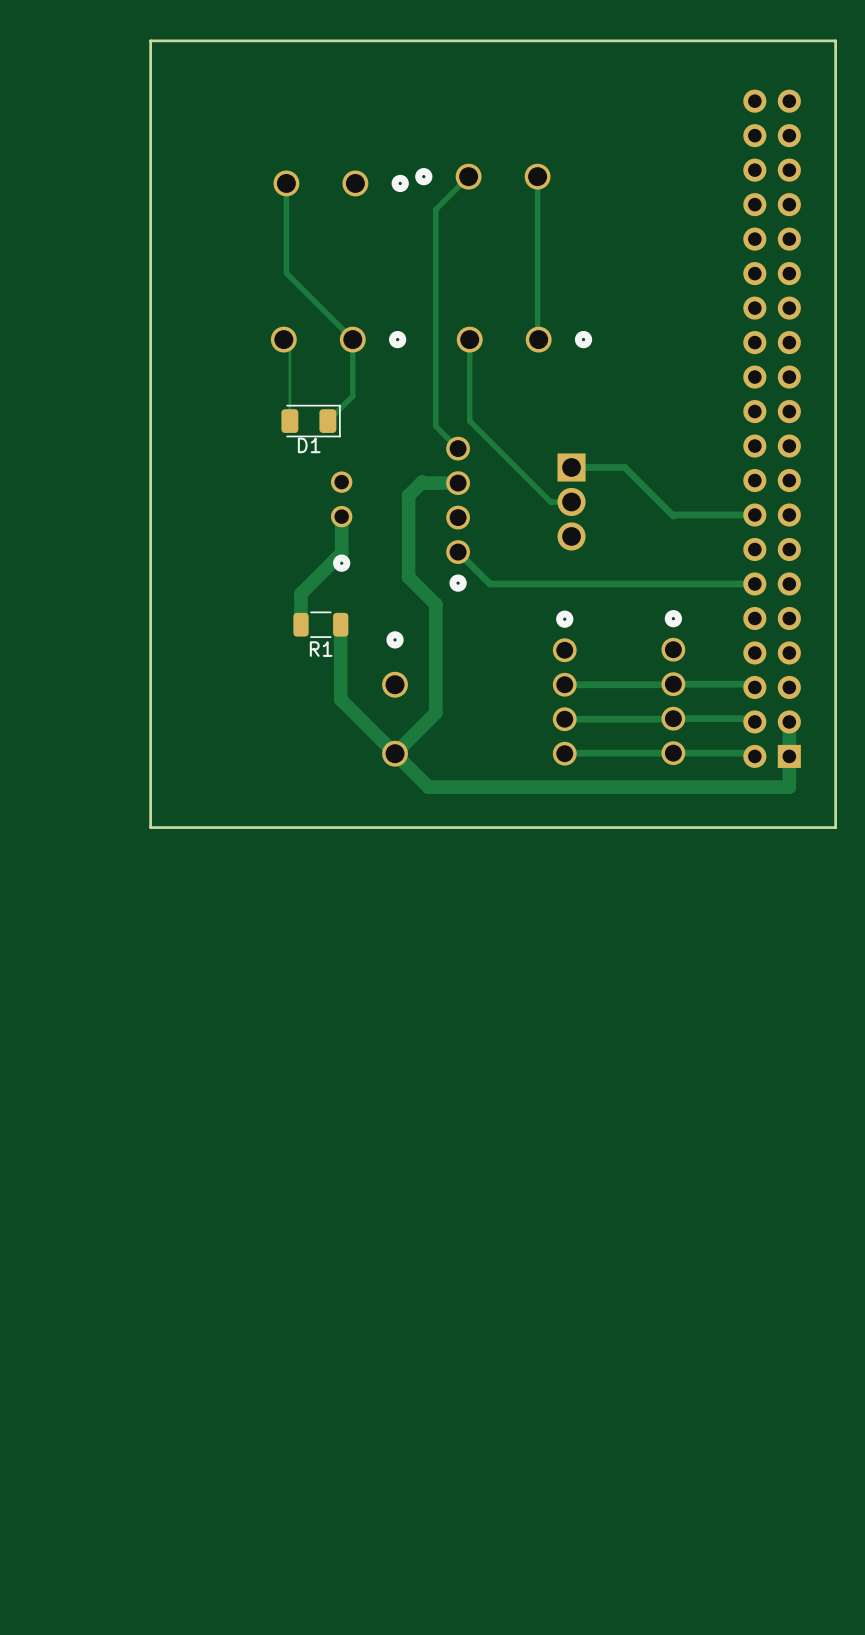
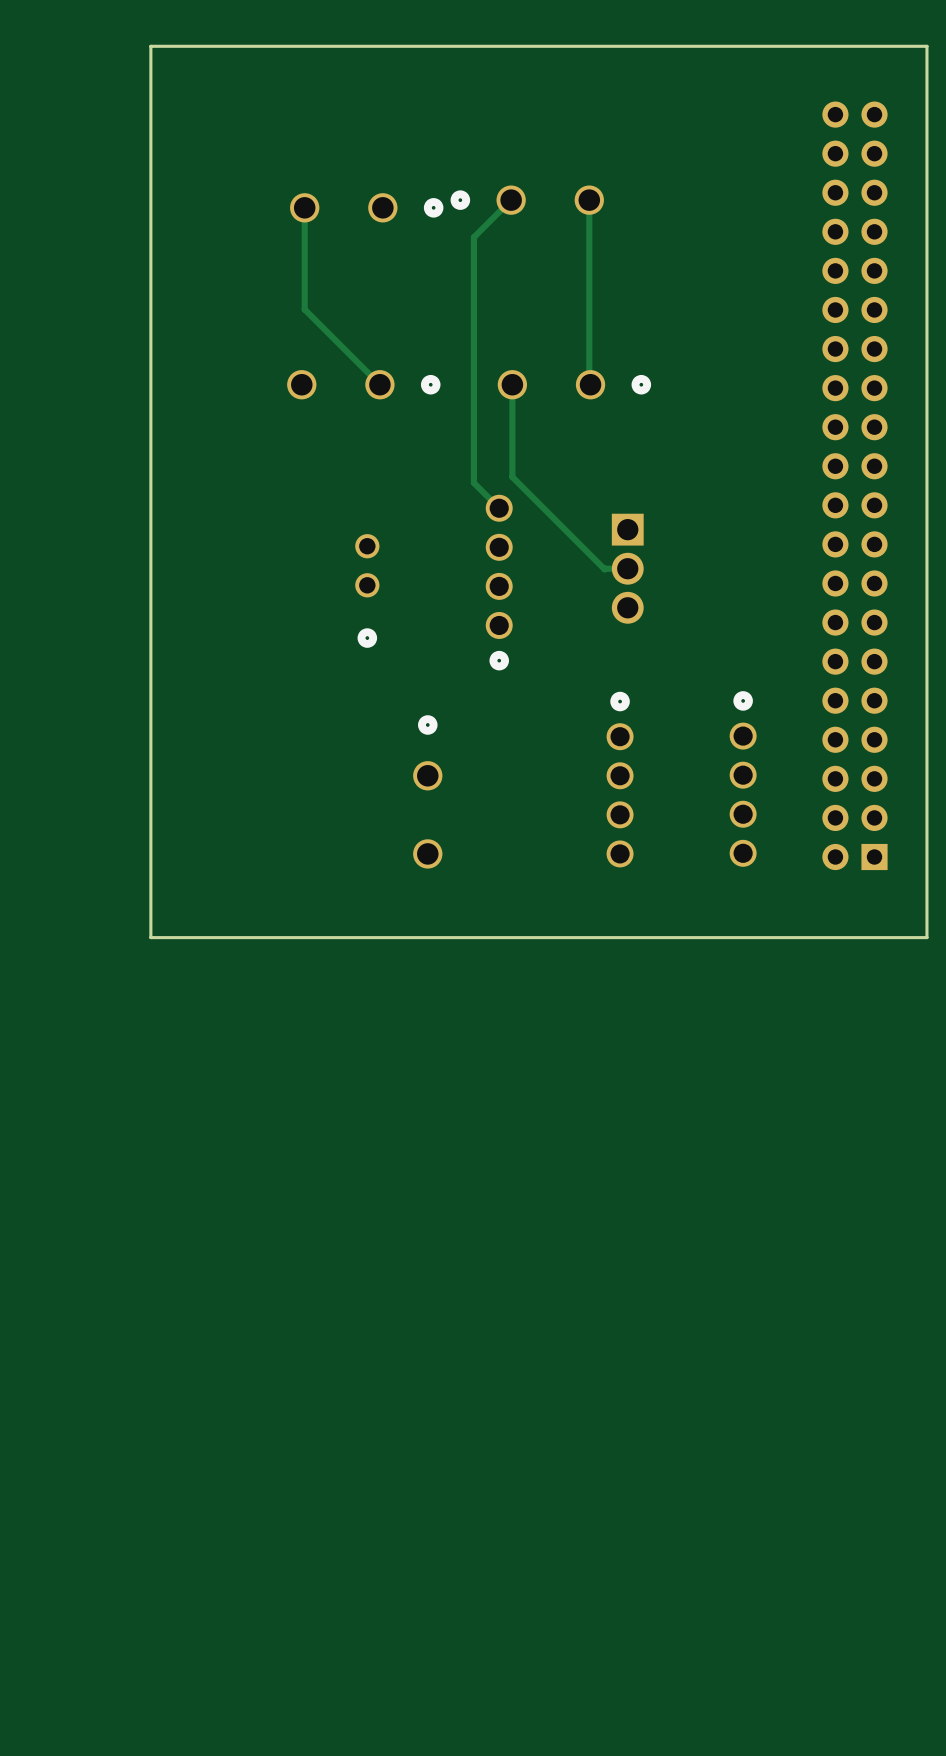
track: (283, 339) (289, 345) (289, 421) -> none
track: (352, 339) (352, 396) (327, 421) -> none
D1: (311, 421) -> none
track: (571, 467) (624, 467) (673, 516) (754, 515) -> none
track: (458, 483) (422, 482) (408, 495) (408, 577) (435, 604) (435, 712) (395, 753) -> none
track: (341, 516) (341, 553) (301, 593) (301, 624) -> none
track: (458, 552) (490, 583) (754, 583) -> none
R1: (320, 624) -> none
track: (340, 624) (340, 699) (428, 787) (789, 787) (789, 721) -> none
track: (564, 684) (751, 684) (754, 687) -> none
track: (564, 719) (751, 718) (754, 721) -> none
track: (564, 753) (751, 753) (754, 756) -> none

